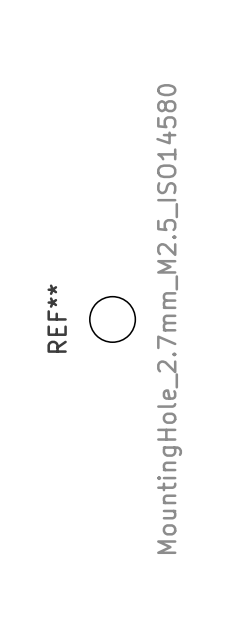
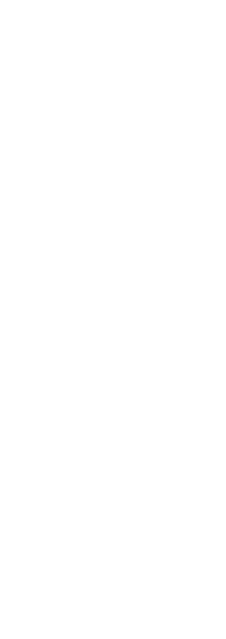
REF**: MountingHole_2.7mm_M2.5_ISO14580 (112, 319) -> none

